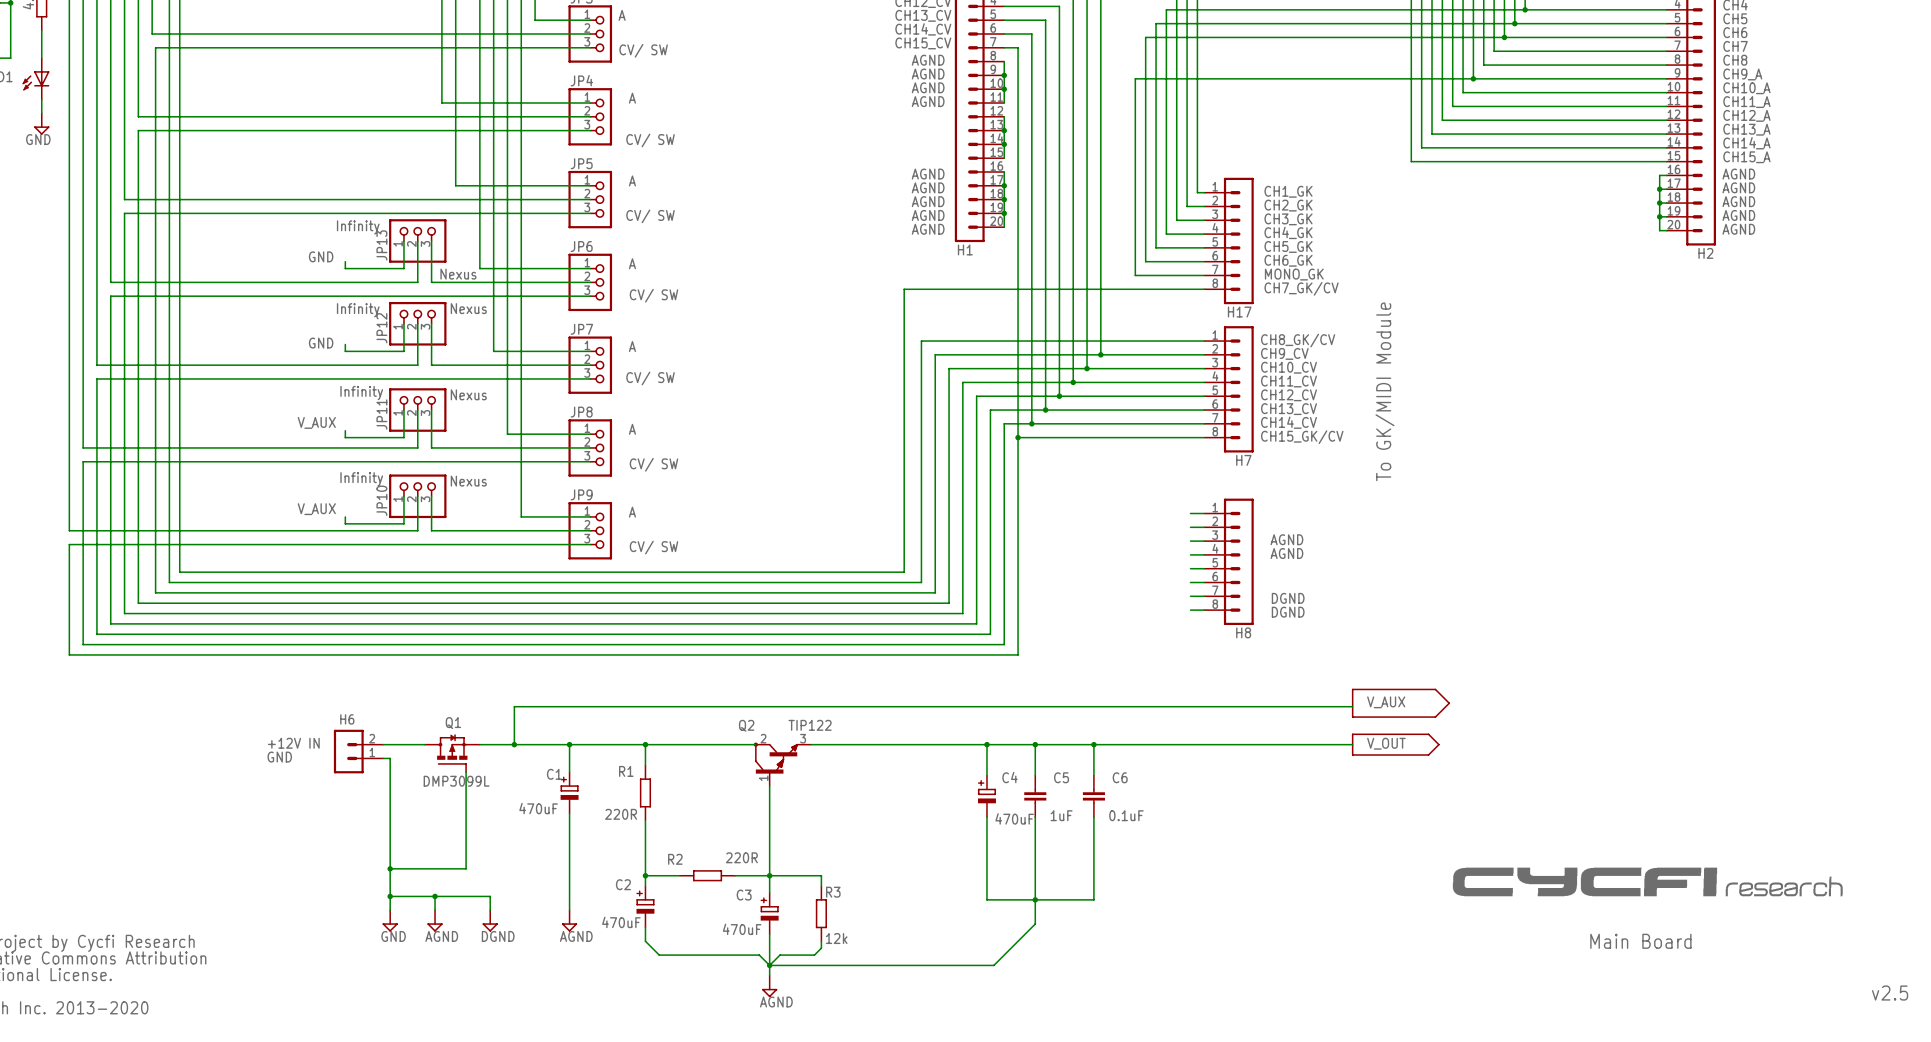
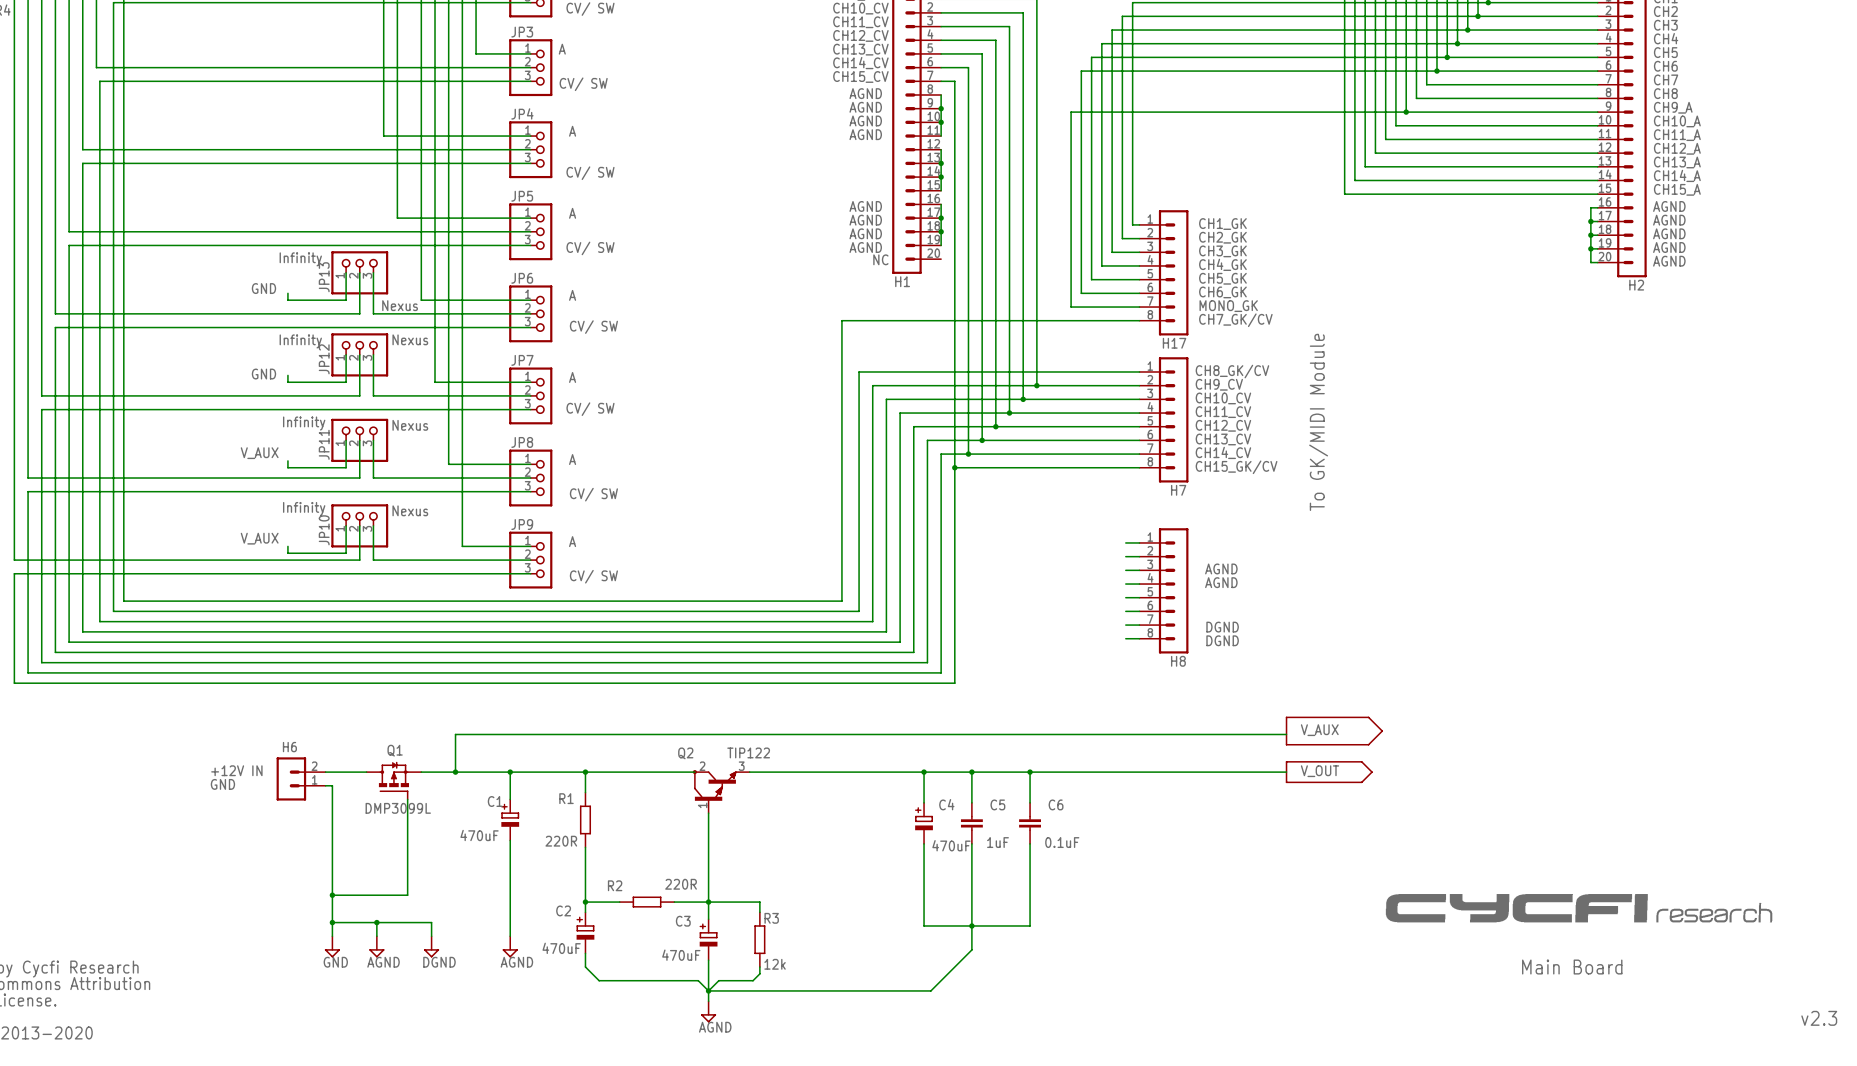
wire: (1004, 213) (1004, 227) -> none
junction: (1004, 213) -> none
text: none -> NC (880, 259)
text: AGND (928, 229) -> none
text: v2.5 (1890, 993) -> v2.3 (1819, 1018)

